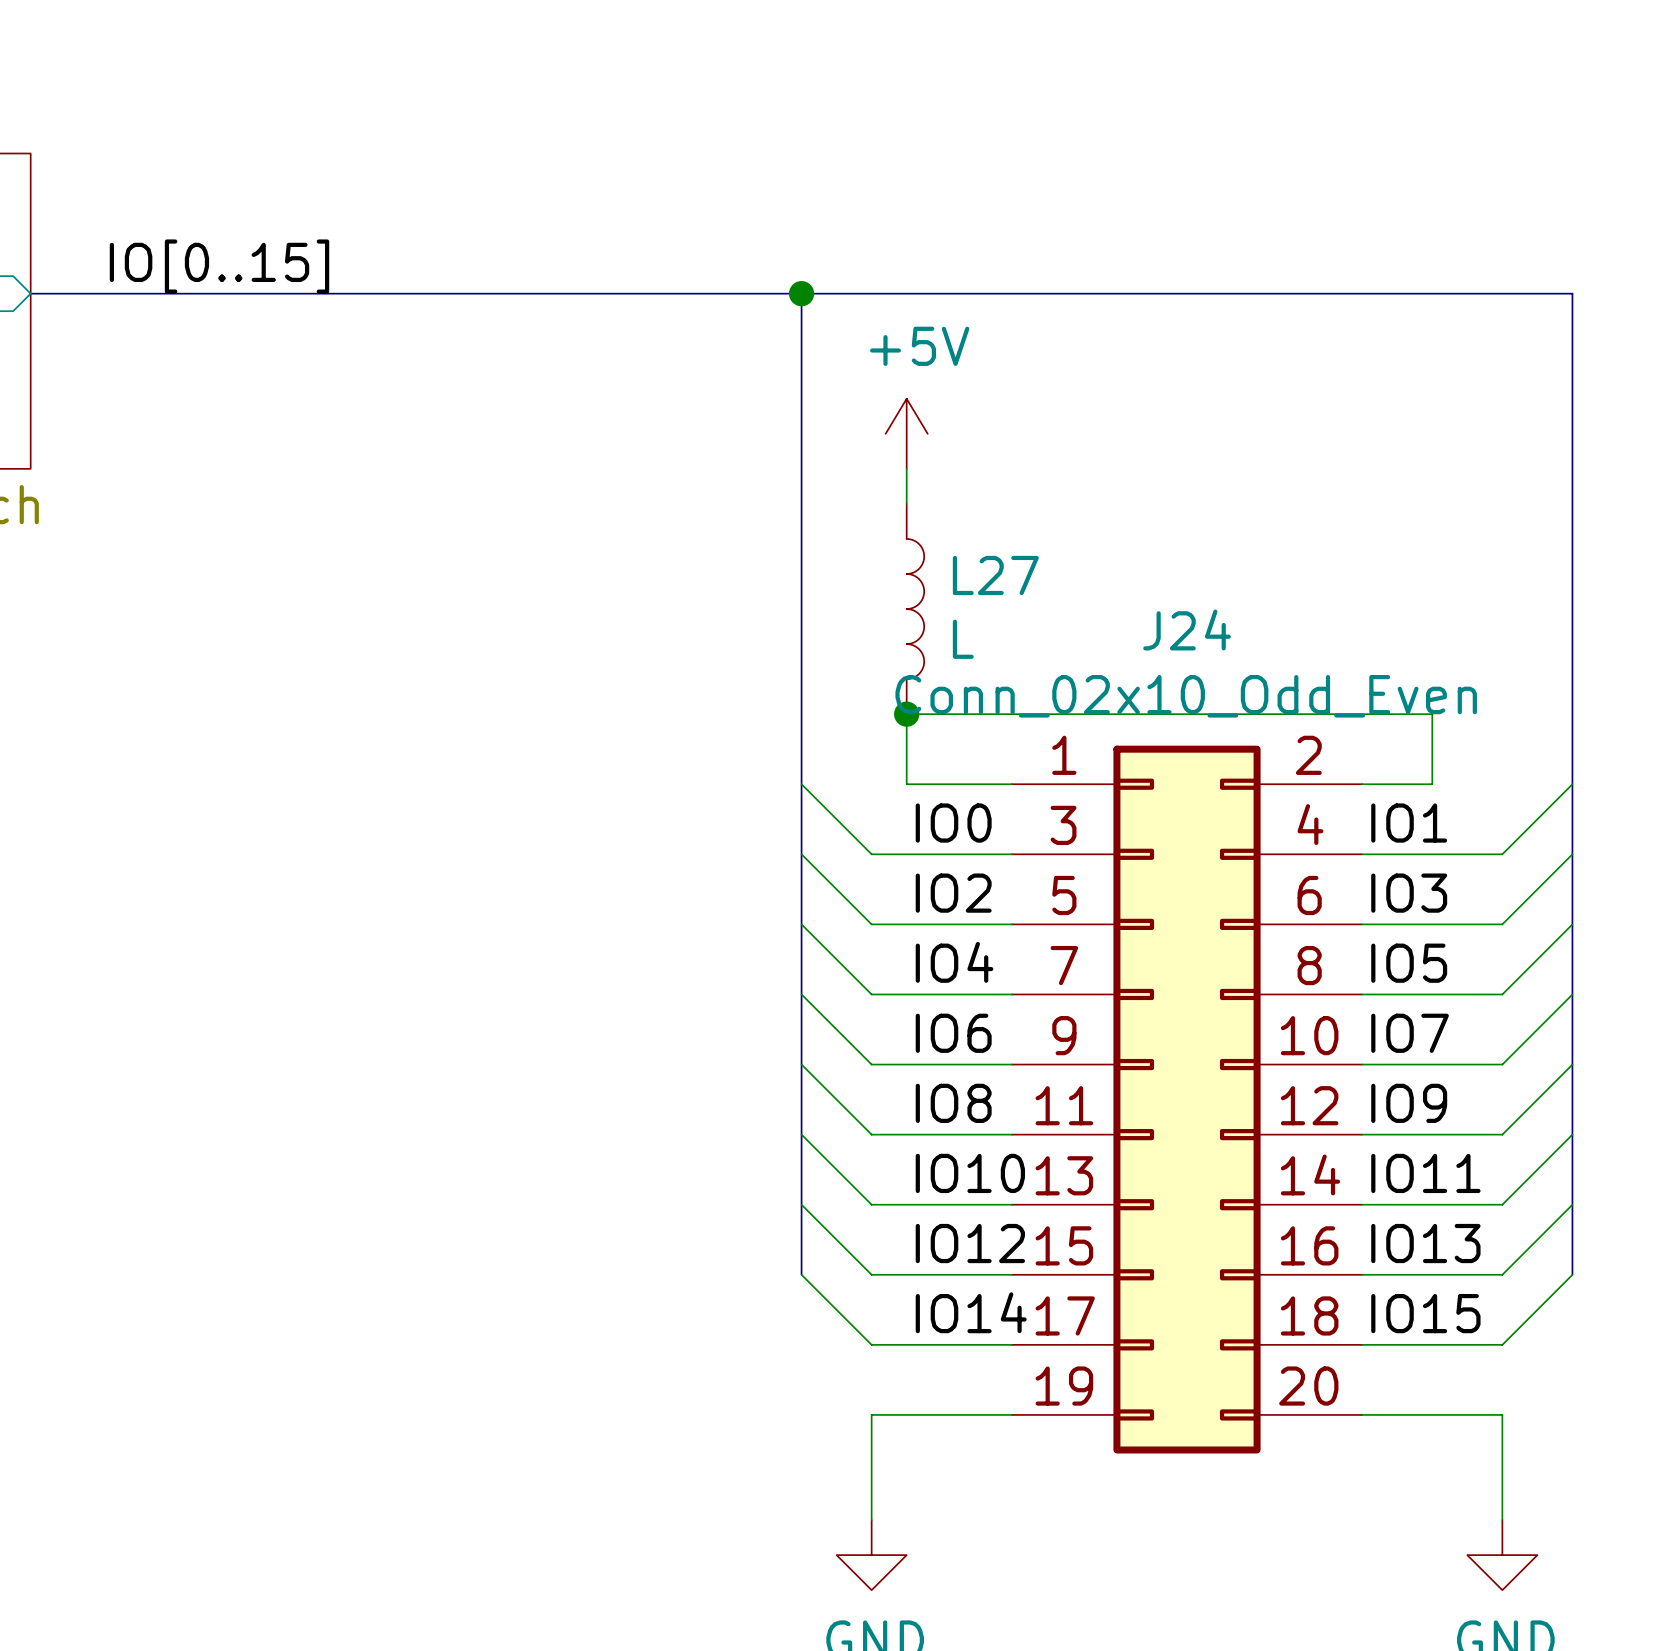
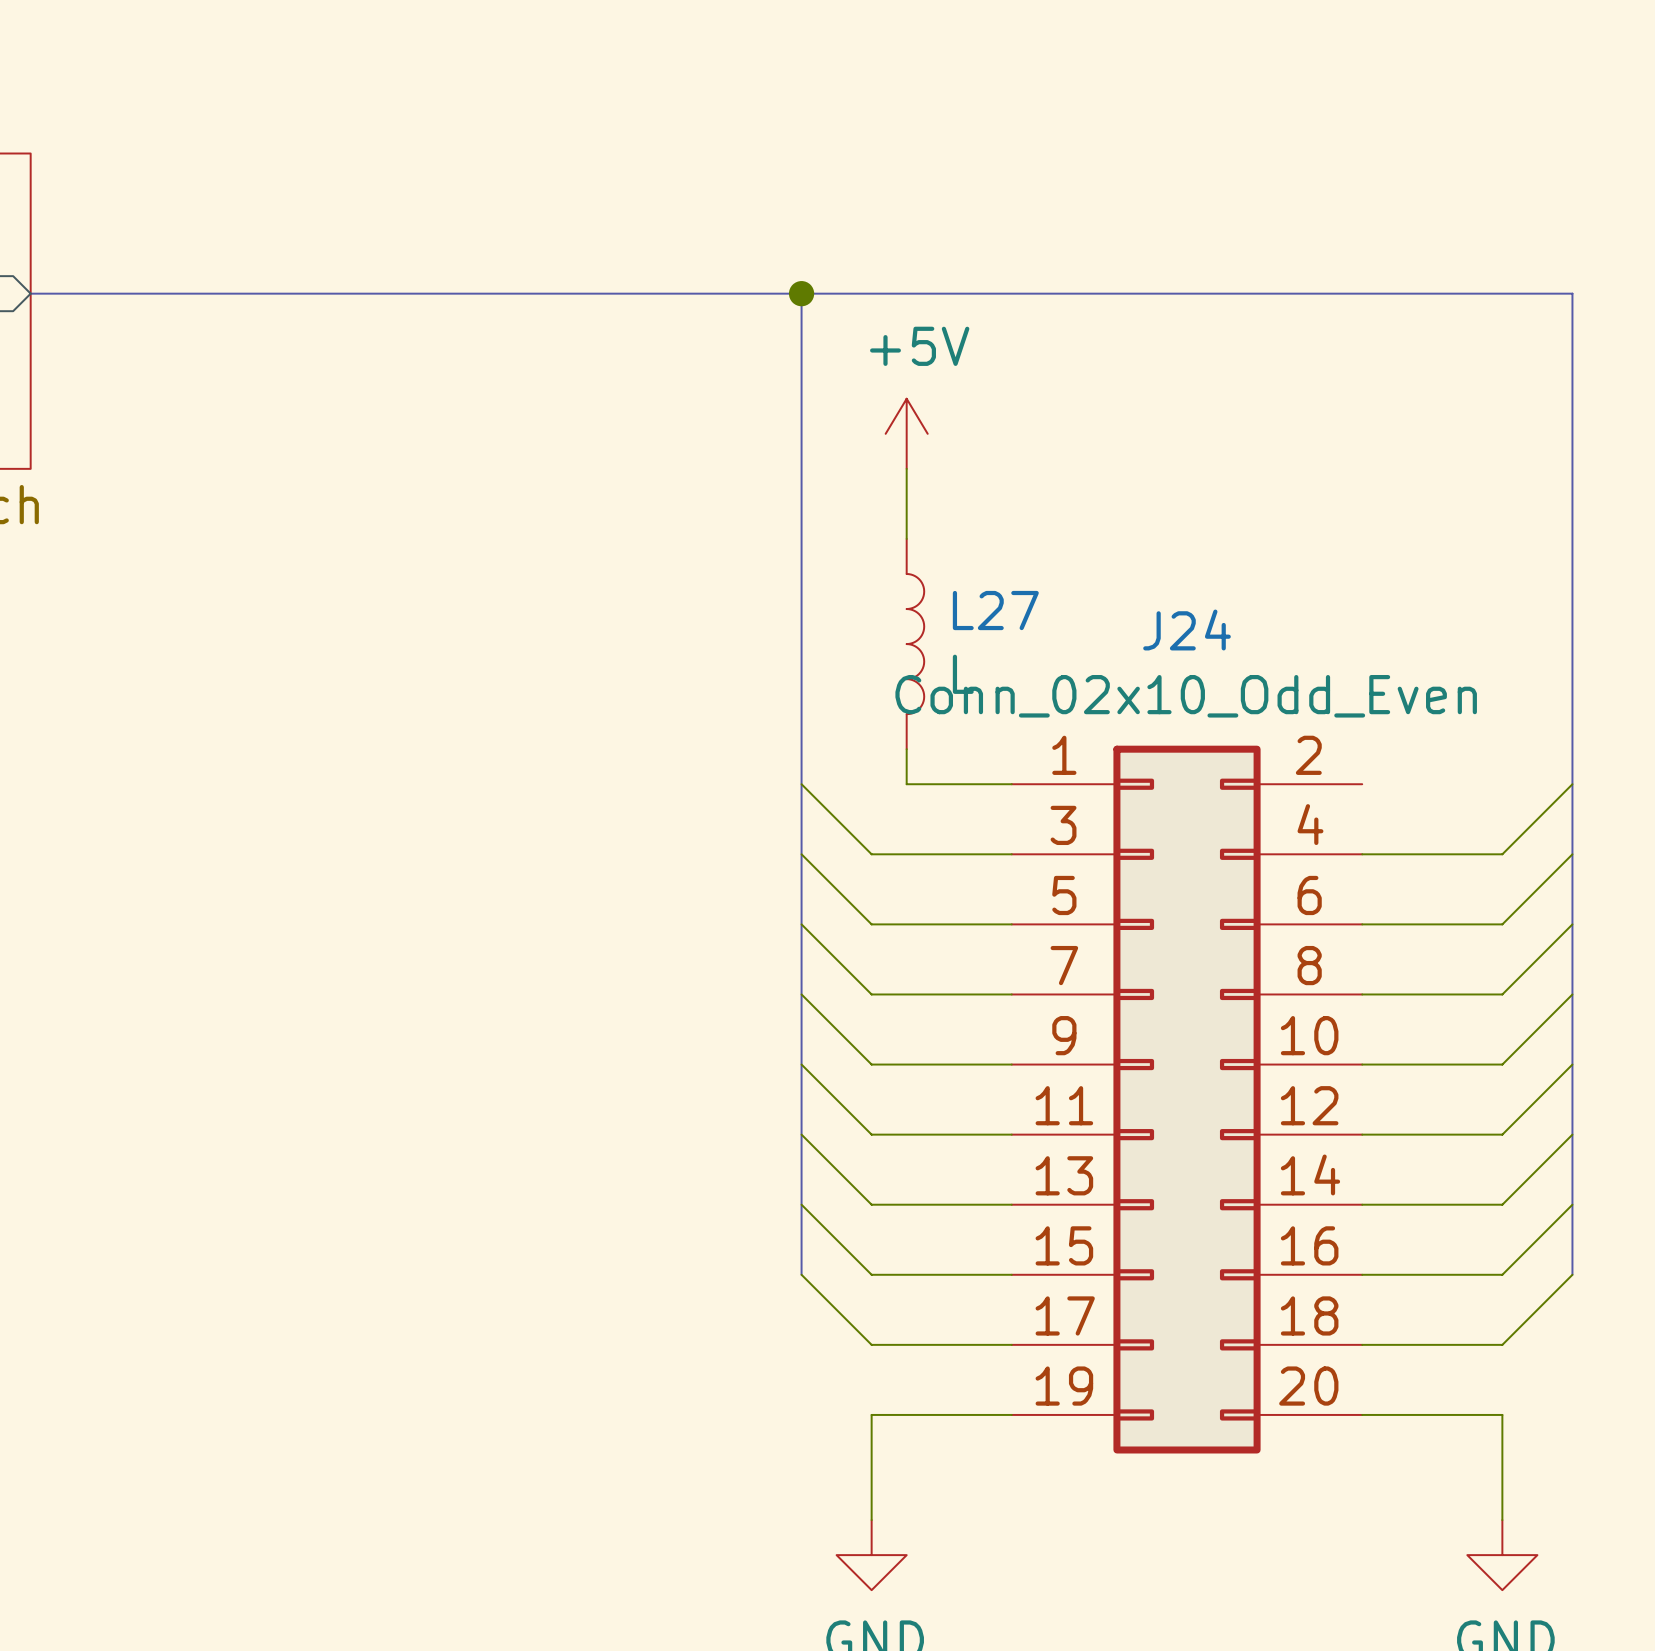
label: IO[0..15] (219, 266) -> none
L27 position: (915, 609) -> (915, 644)
junction: (906, 714) -> none
wire: (906, 749) (906, 714) (1432, 714) (1432, 784) (1362, 784) -> none
label: IO0 (953, 823) -> none
label: IO1 (1409, 823) -> none
label: IO2 (953, 893) -> none
label: IO3 (1409, 893) -> none
label: IO4 (954, 962) -> none
label: IO5 (1409, 963) -> none
label: IO6 (953, 1033) -> none
label: IO7 (1410, 1033) -> none
label: IO8 (953, 1103) -> none
label: IO9 (1409, 1103) -> none
label: IO10 (970, 1173) -> none
label: IO11 (1425, 1173) -> none
label: IO12 (970, 1243) -> none
label: IO13 (1425, 1243) -> none
label: IO14 (971, 1312) -> none
label: IO15 (1425, 1313) -> none

